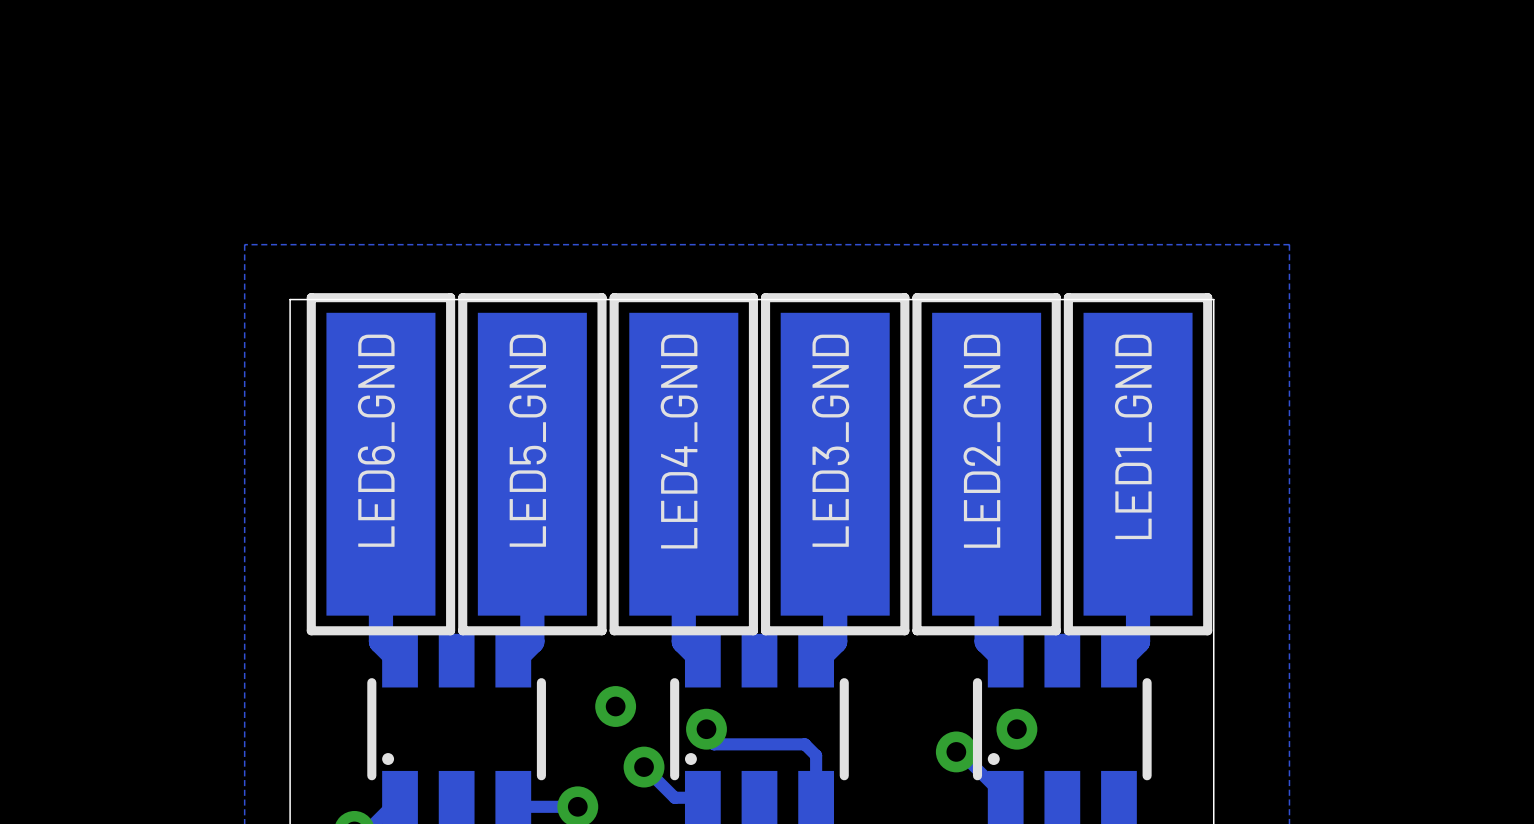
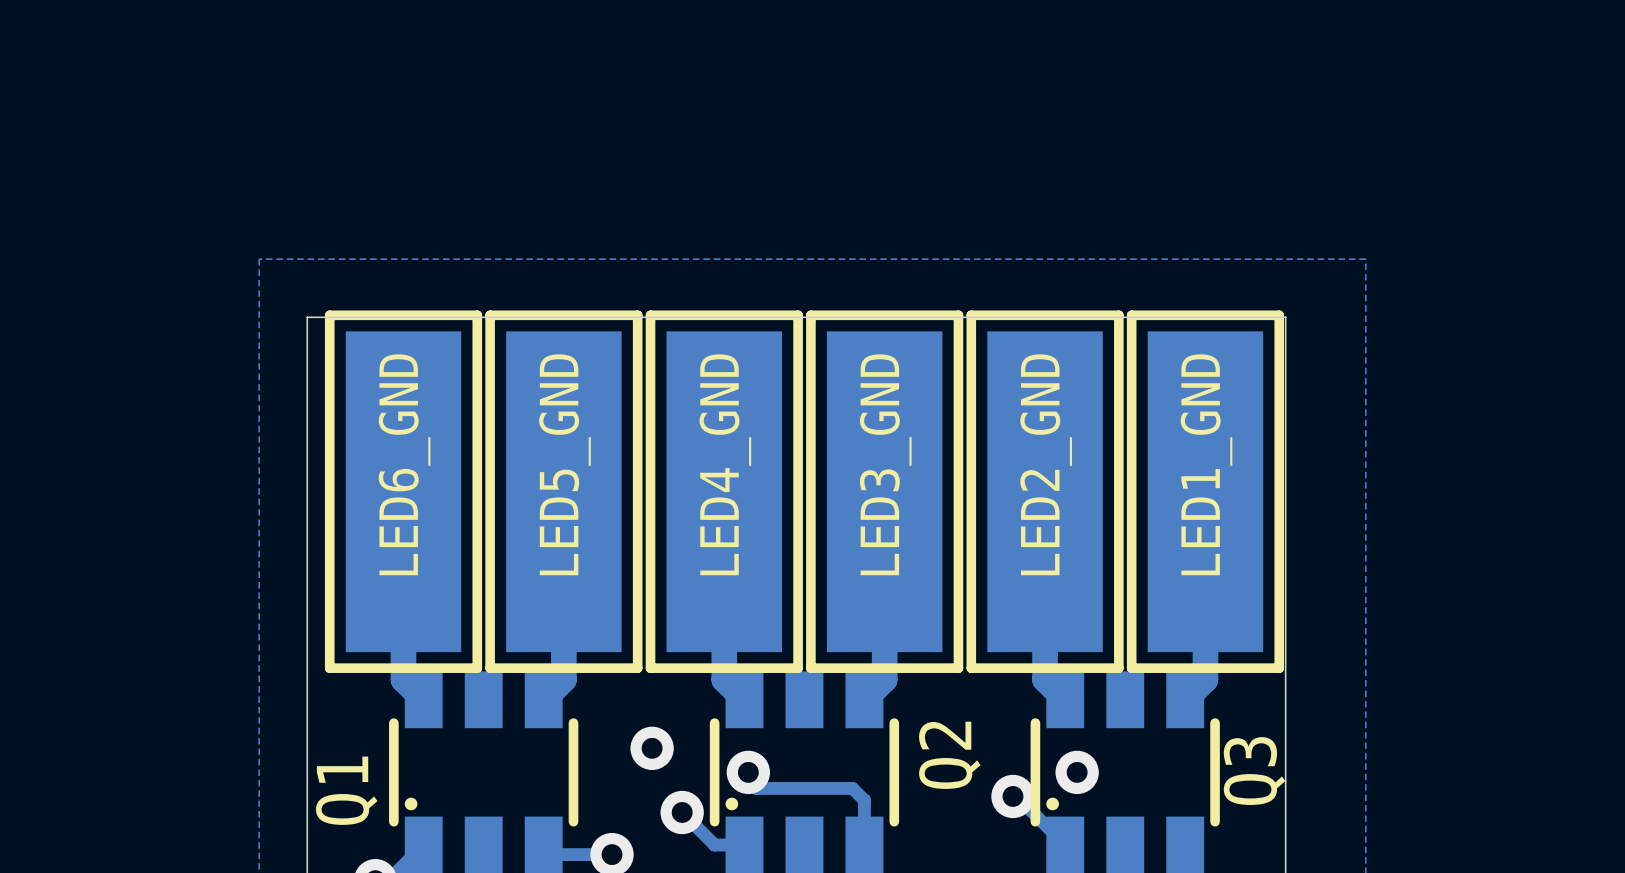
Q2 name: none -> Q2 (949, 755)
Q3 name: none -> Q3 (1254, 771)
Q1 name: none -> Q1 (346, 790)

